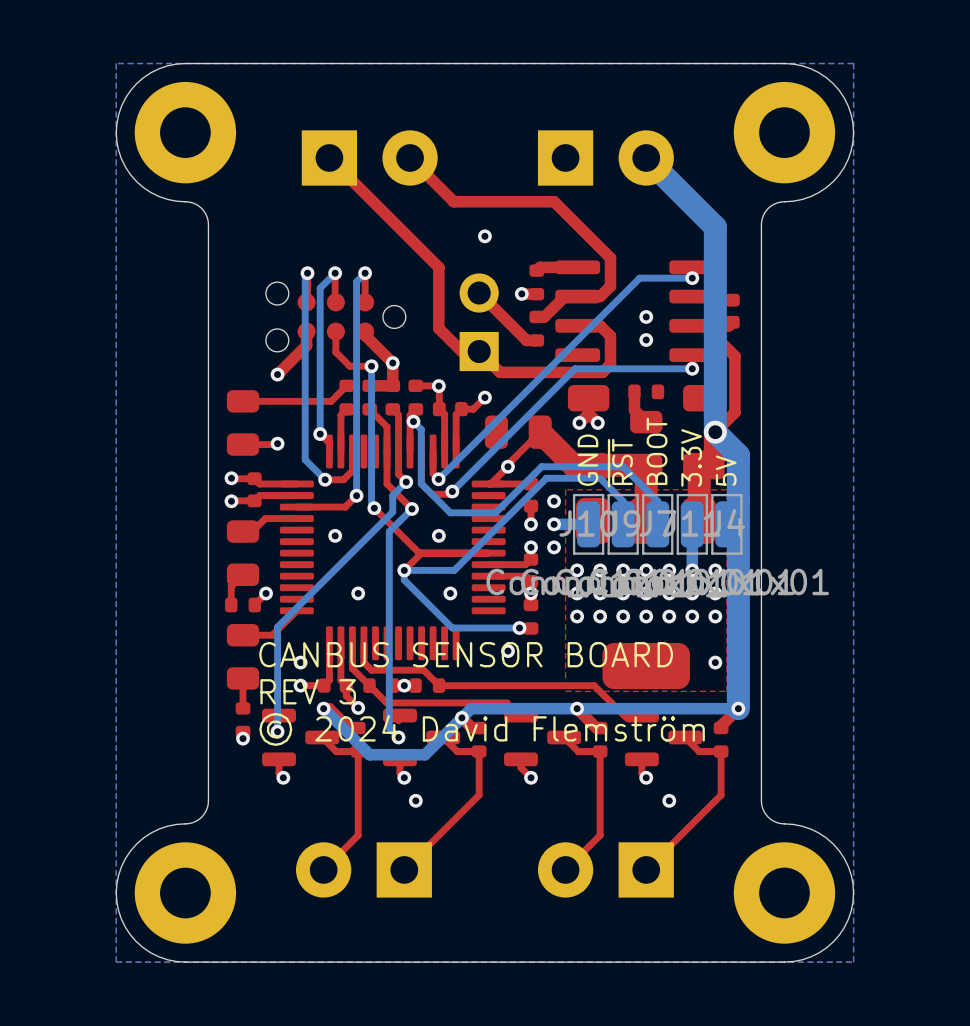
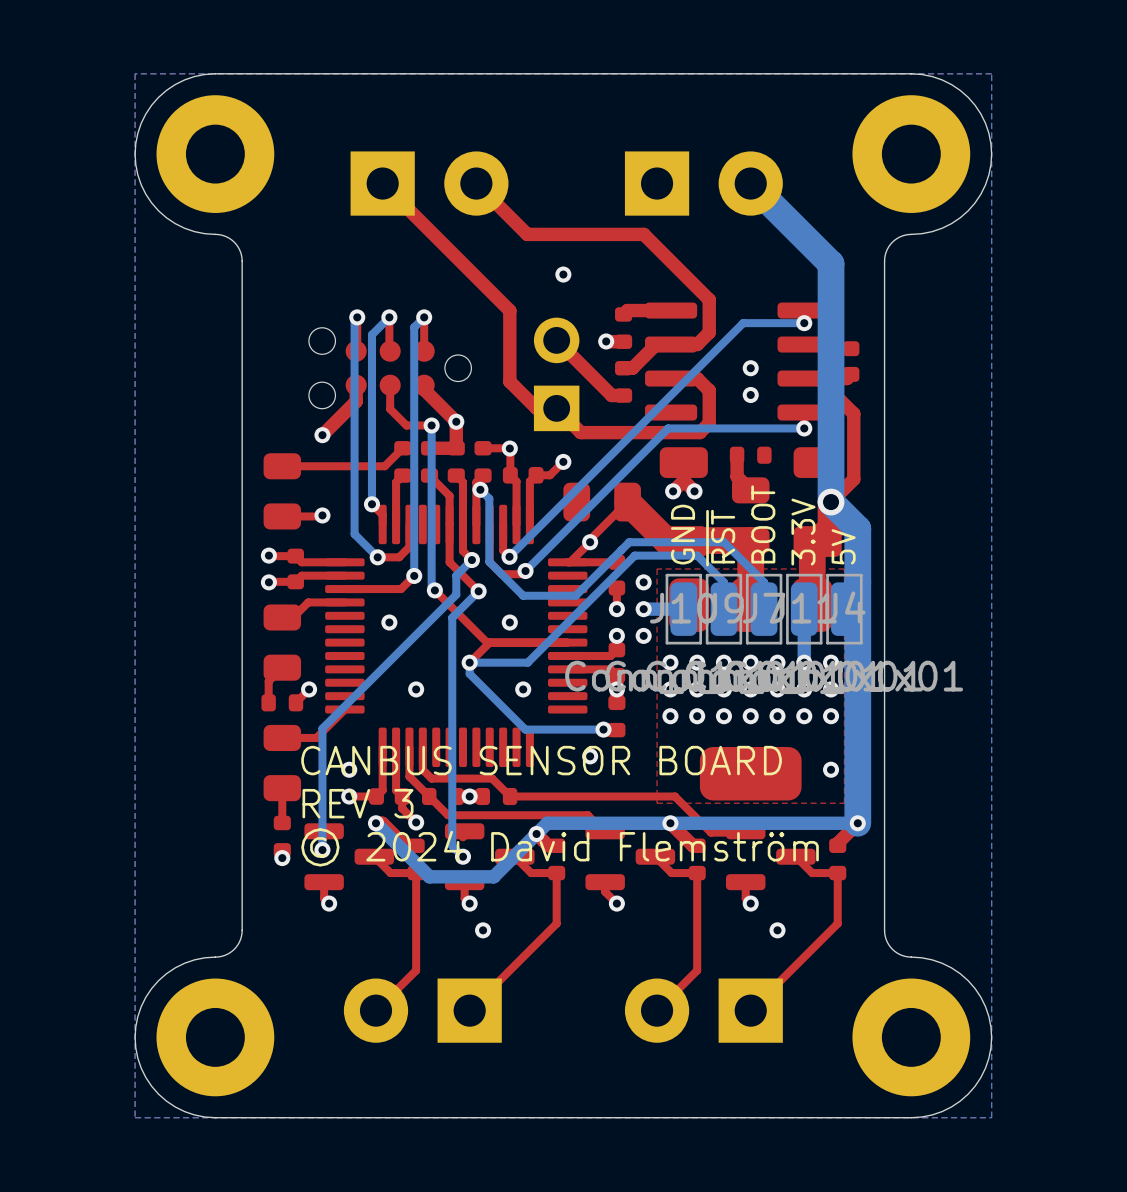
top track: (581, 685) (594, 685) (626, 717) -> (674, 796) (711, 832) (745, 832)
top track: (385, 701) (507, 702) -> (448, 815) (587, 815) (605, 832)

